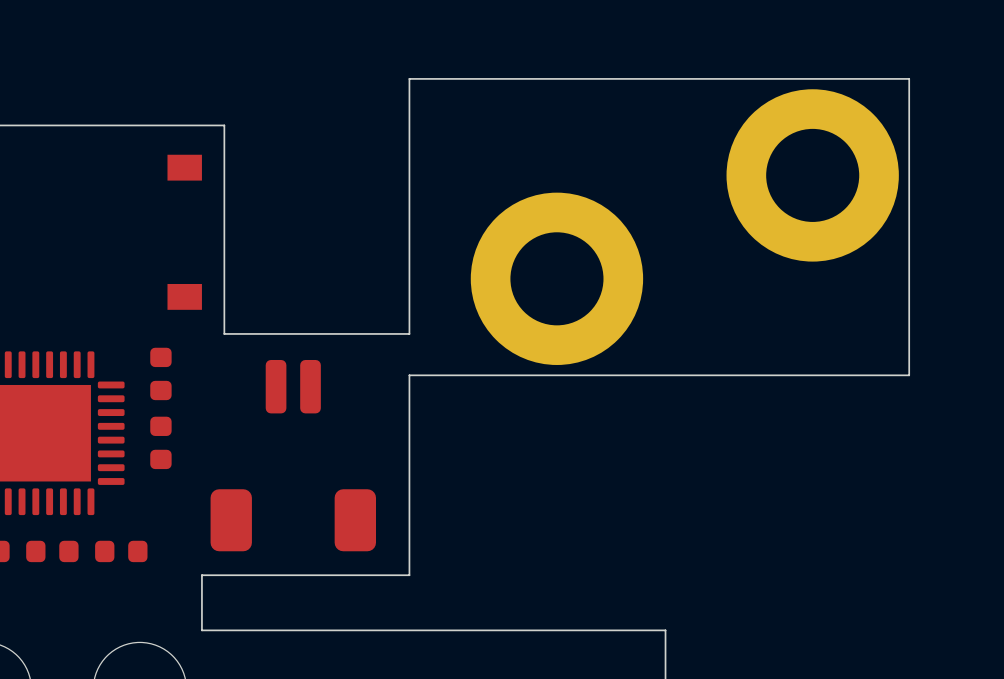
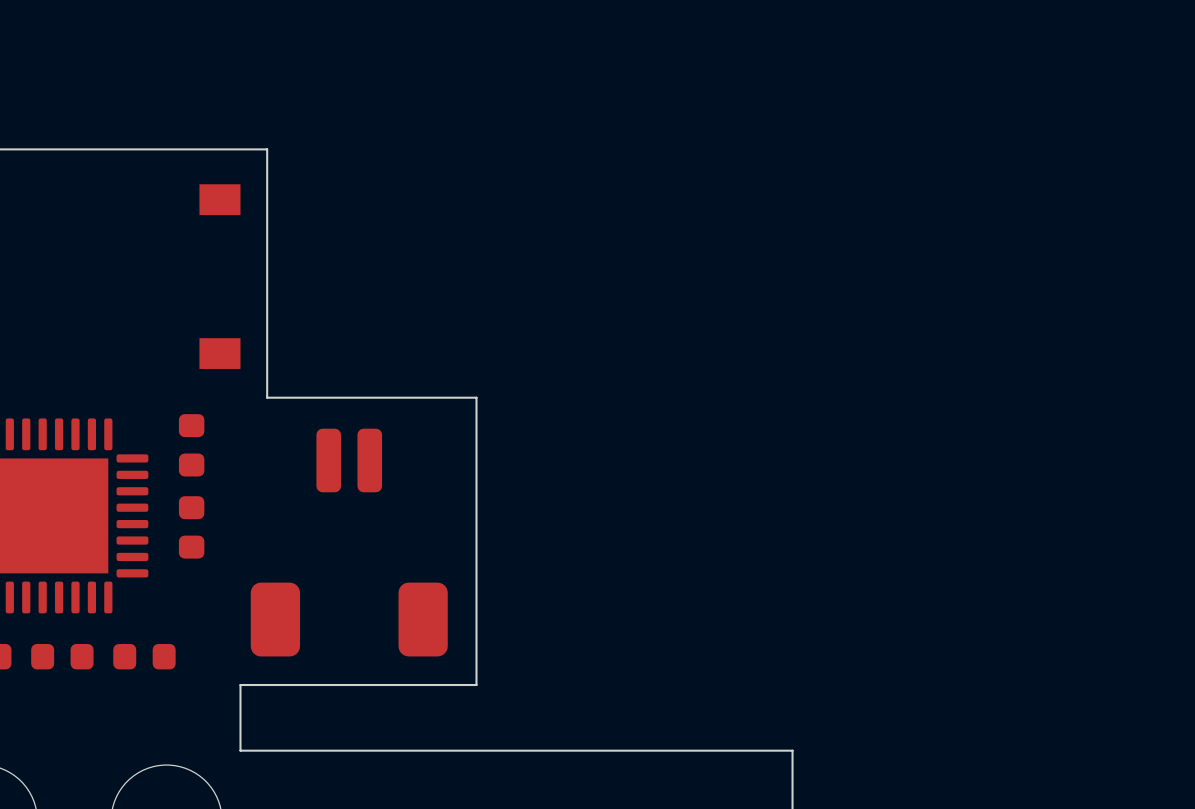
part: (812, 175) -> none
part: (556, 278) -> none
board edge: (400, 333) (409, 333) (409, 78) (909, 78) (909, 375) (409, 375) (409, 575) (400, 575) -> (476, 397) (476, 685)

